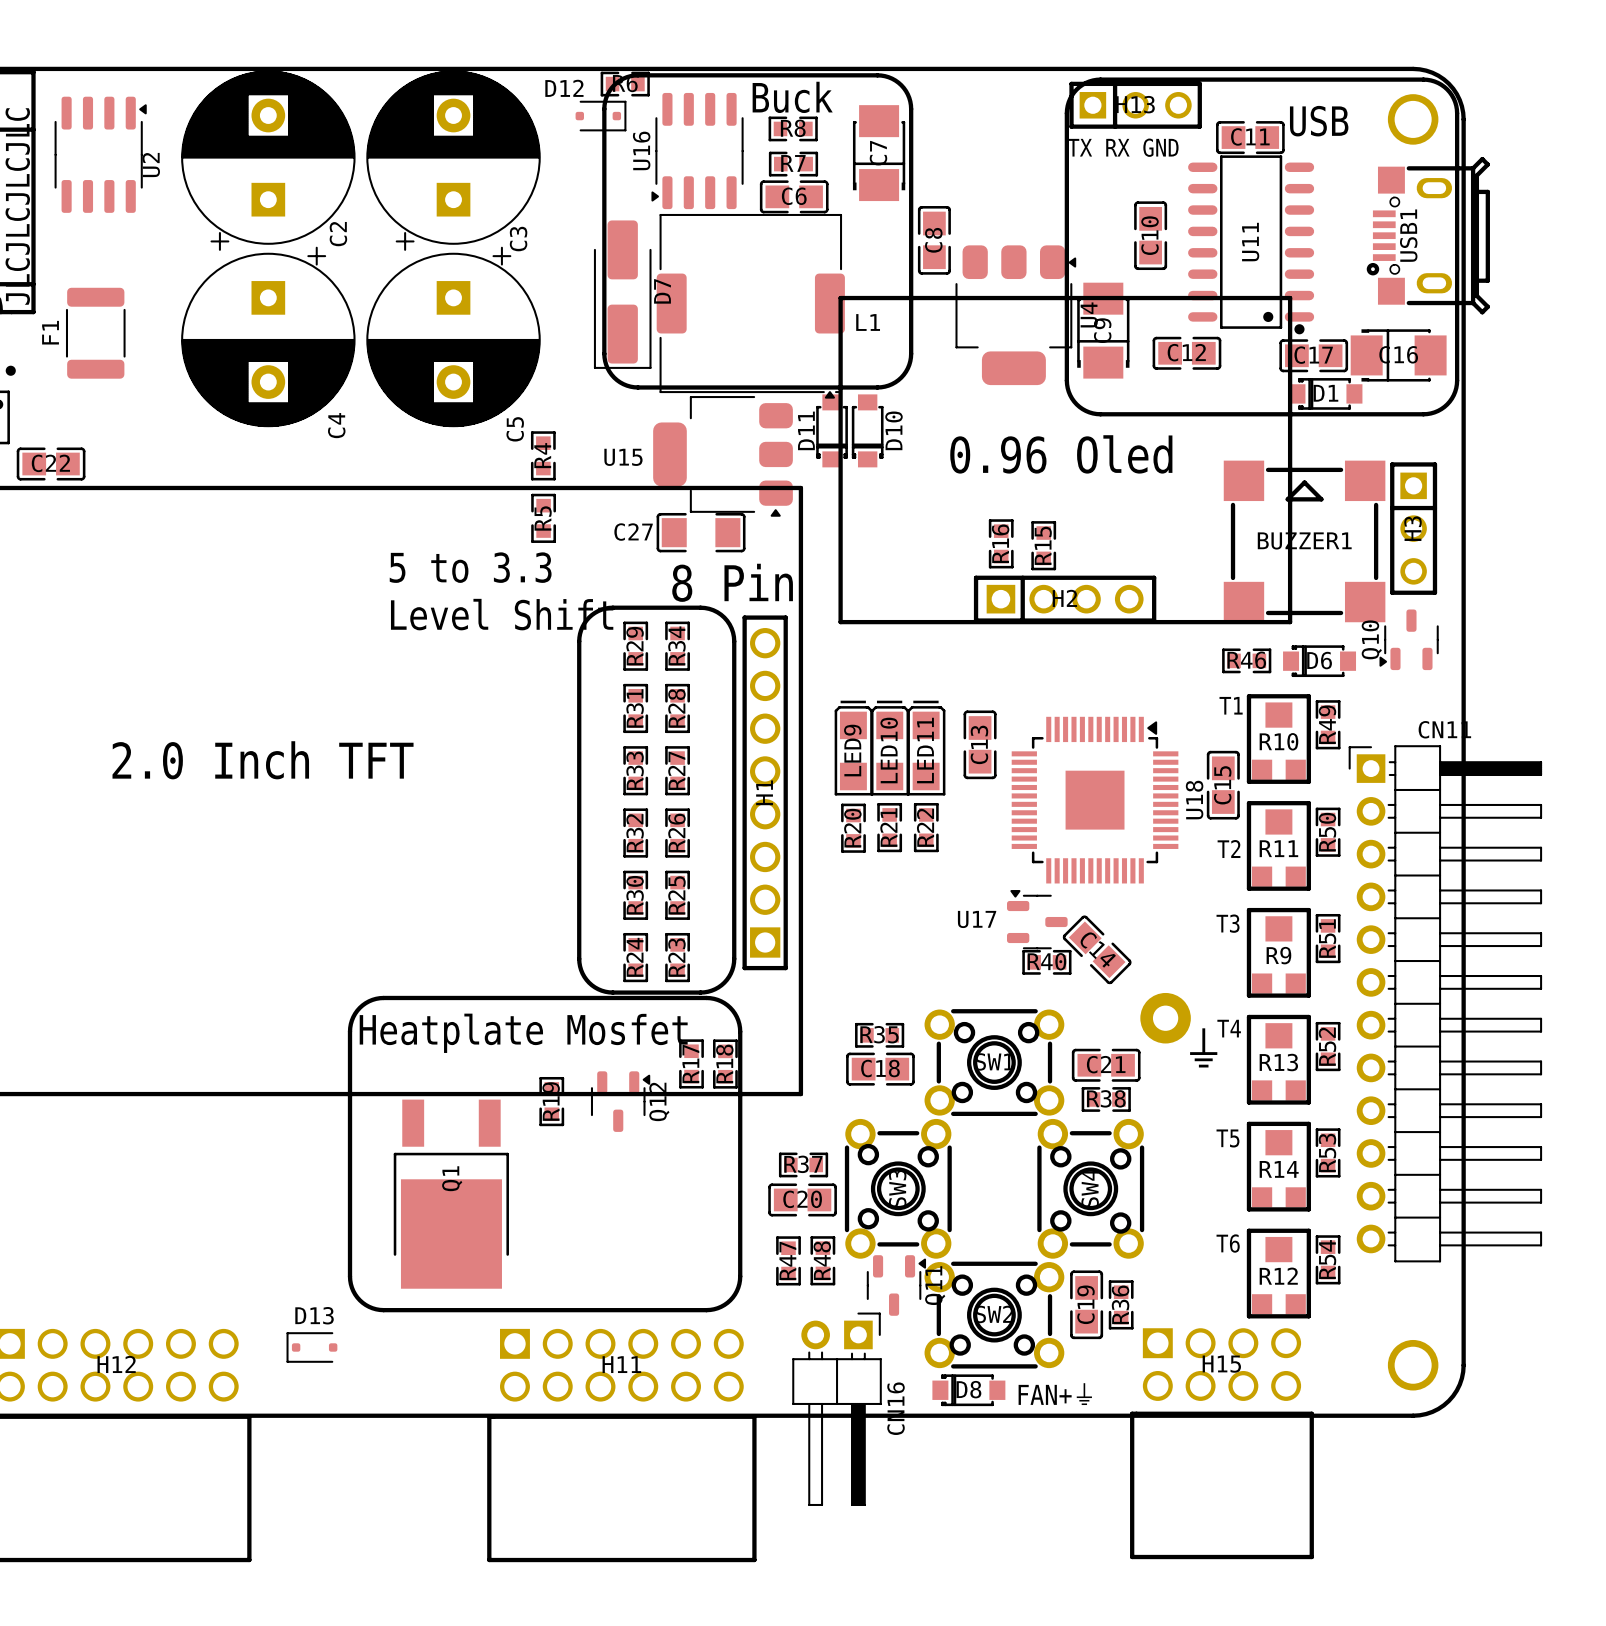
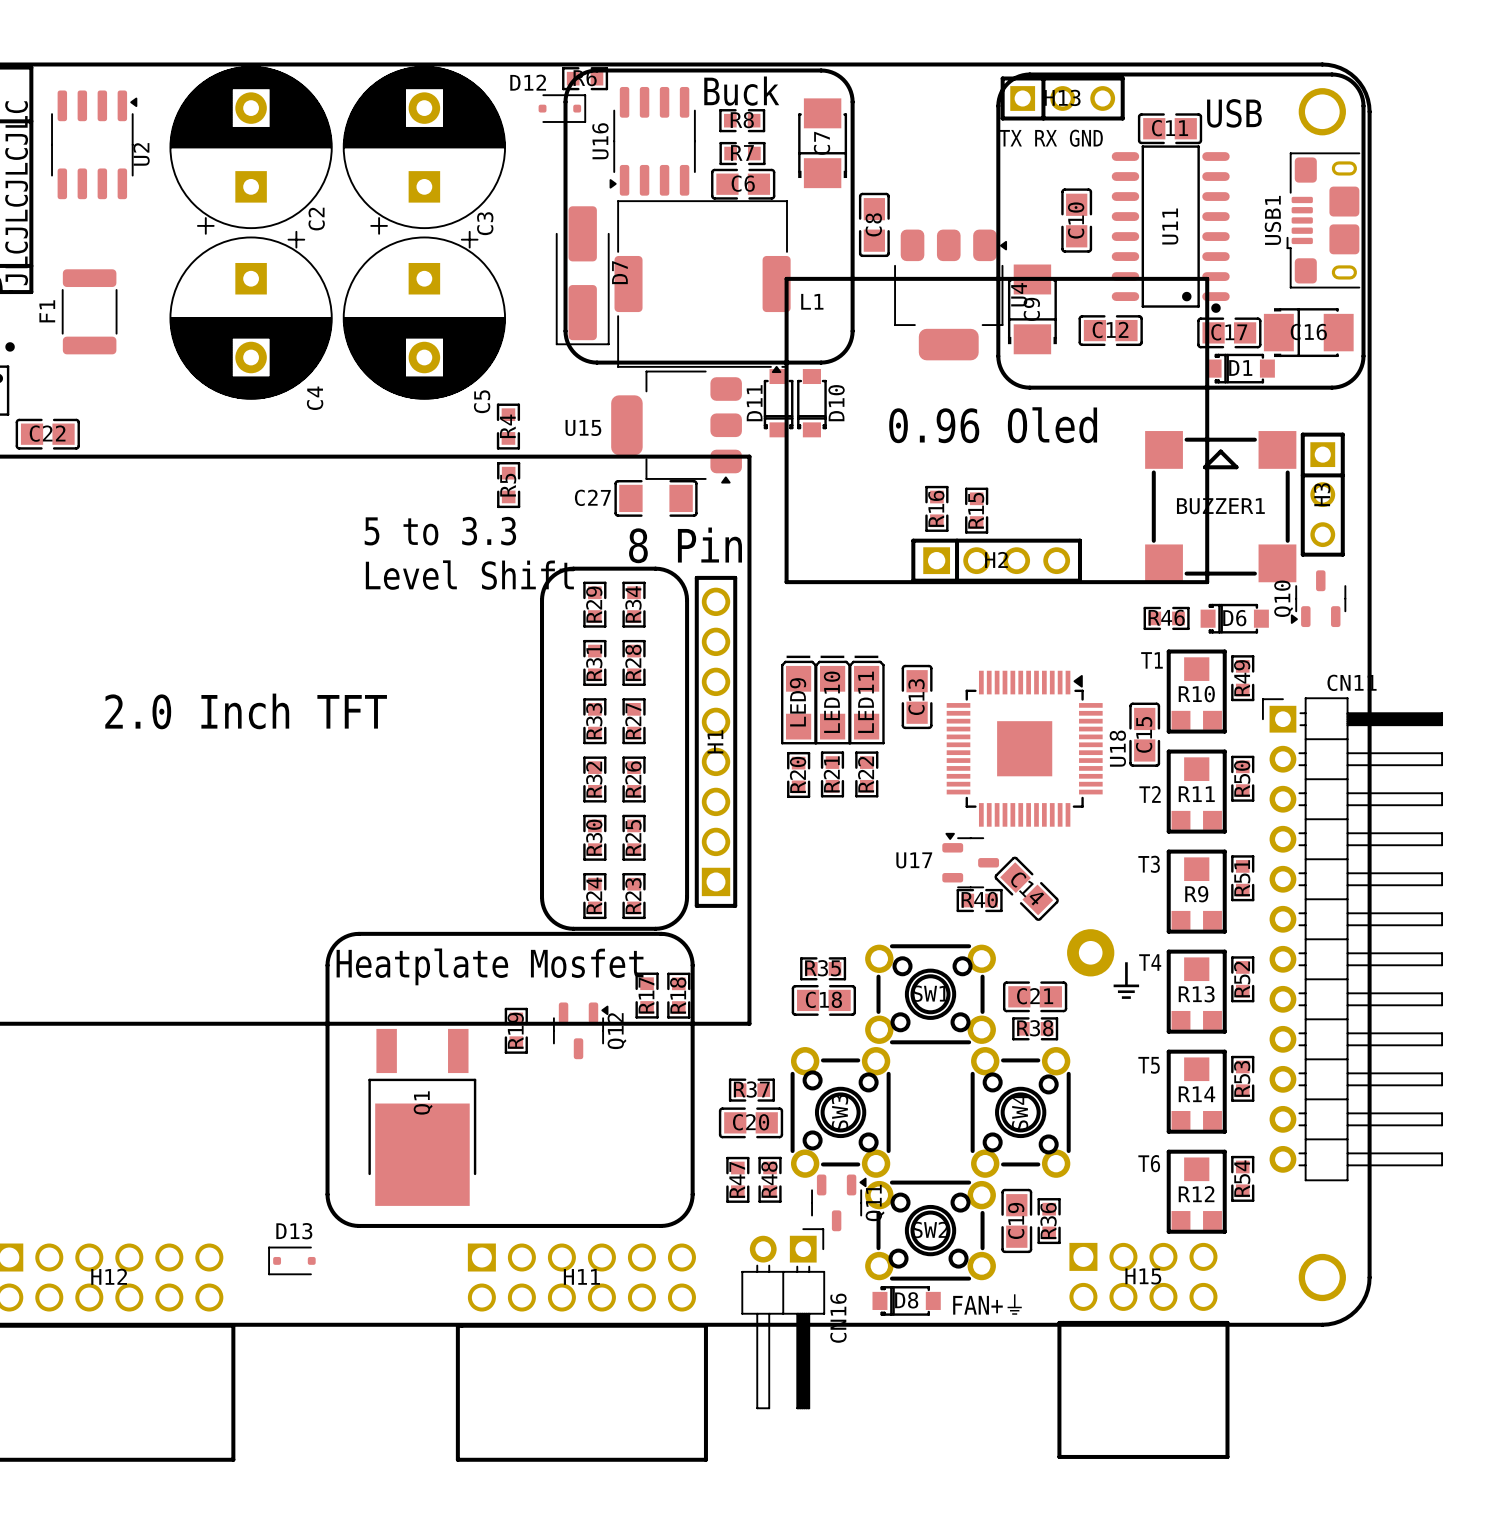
USB1 footprint: [1366, 156, 1490, 315] -> [1286, 152, 1361, 289]
USB1 name position: USB1 (1408, 235) -> USB1 (1272, 220)

